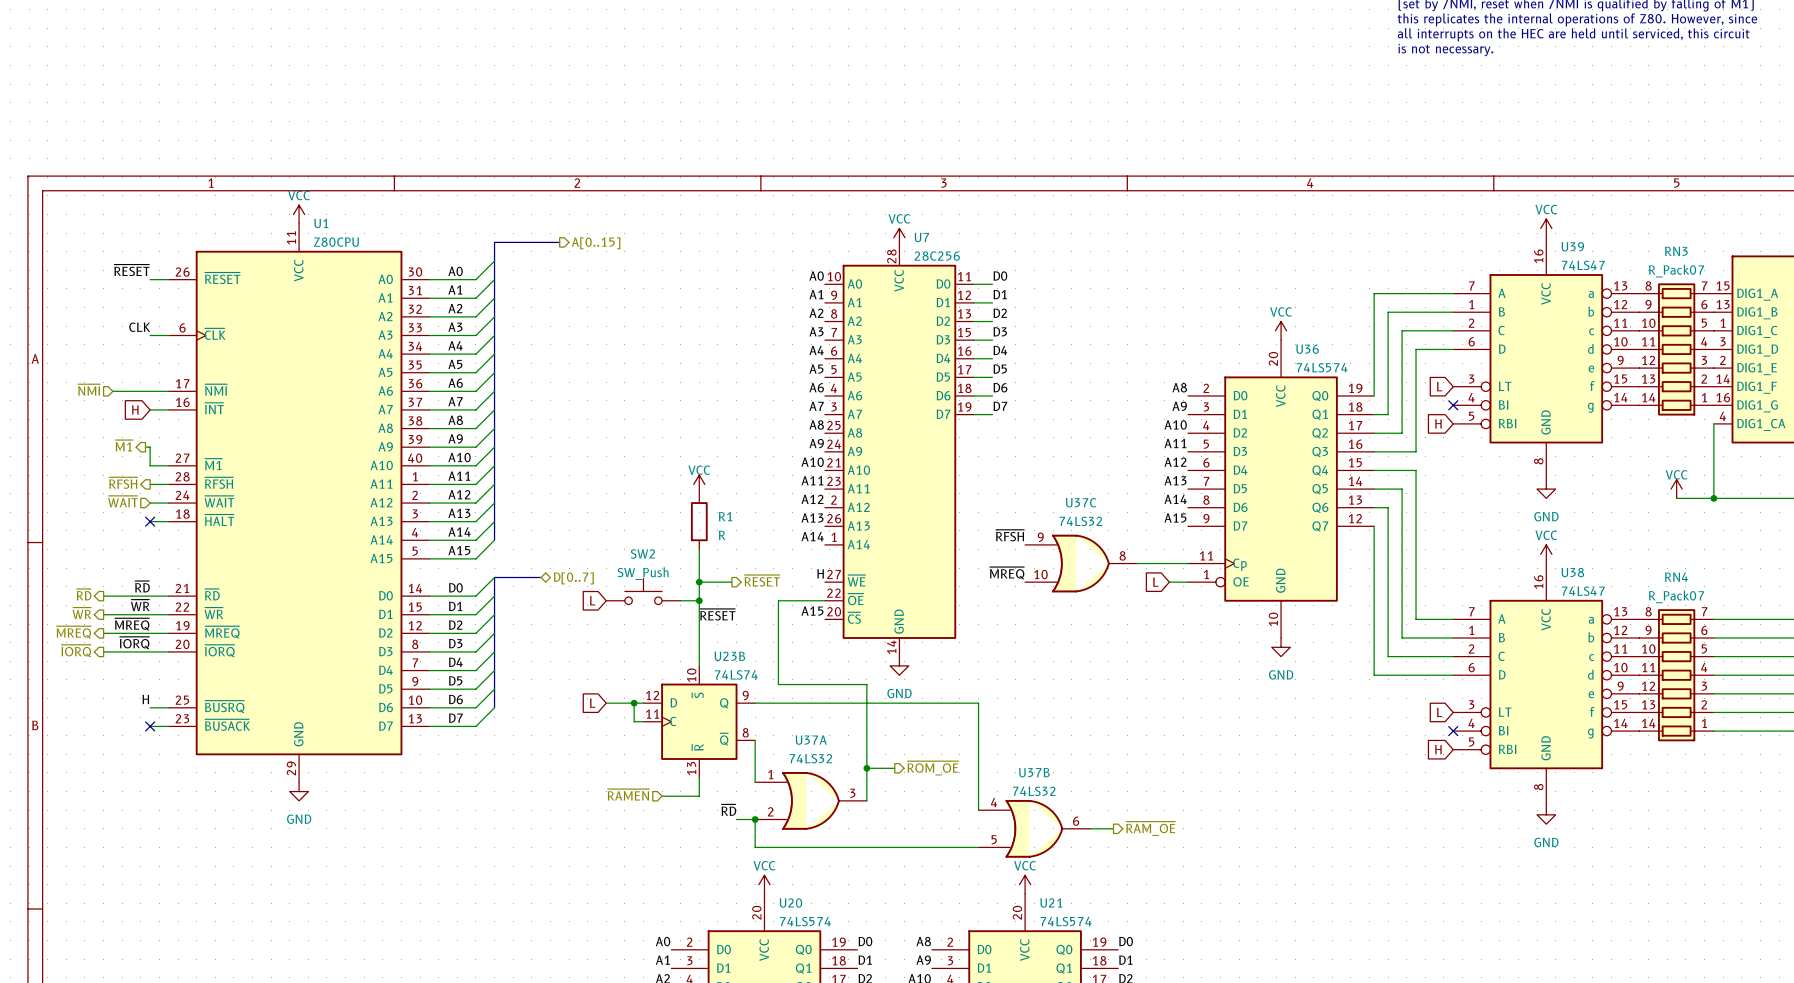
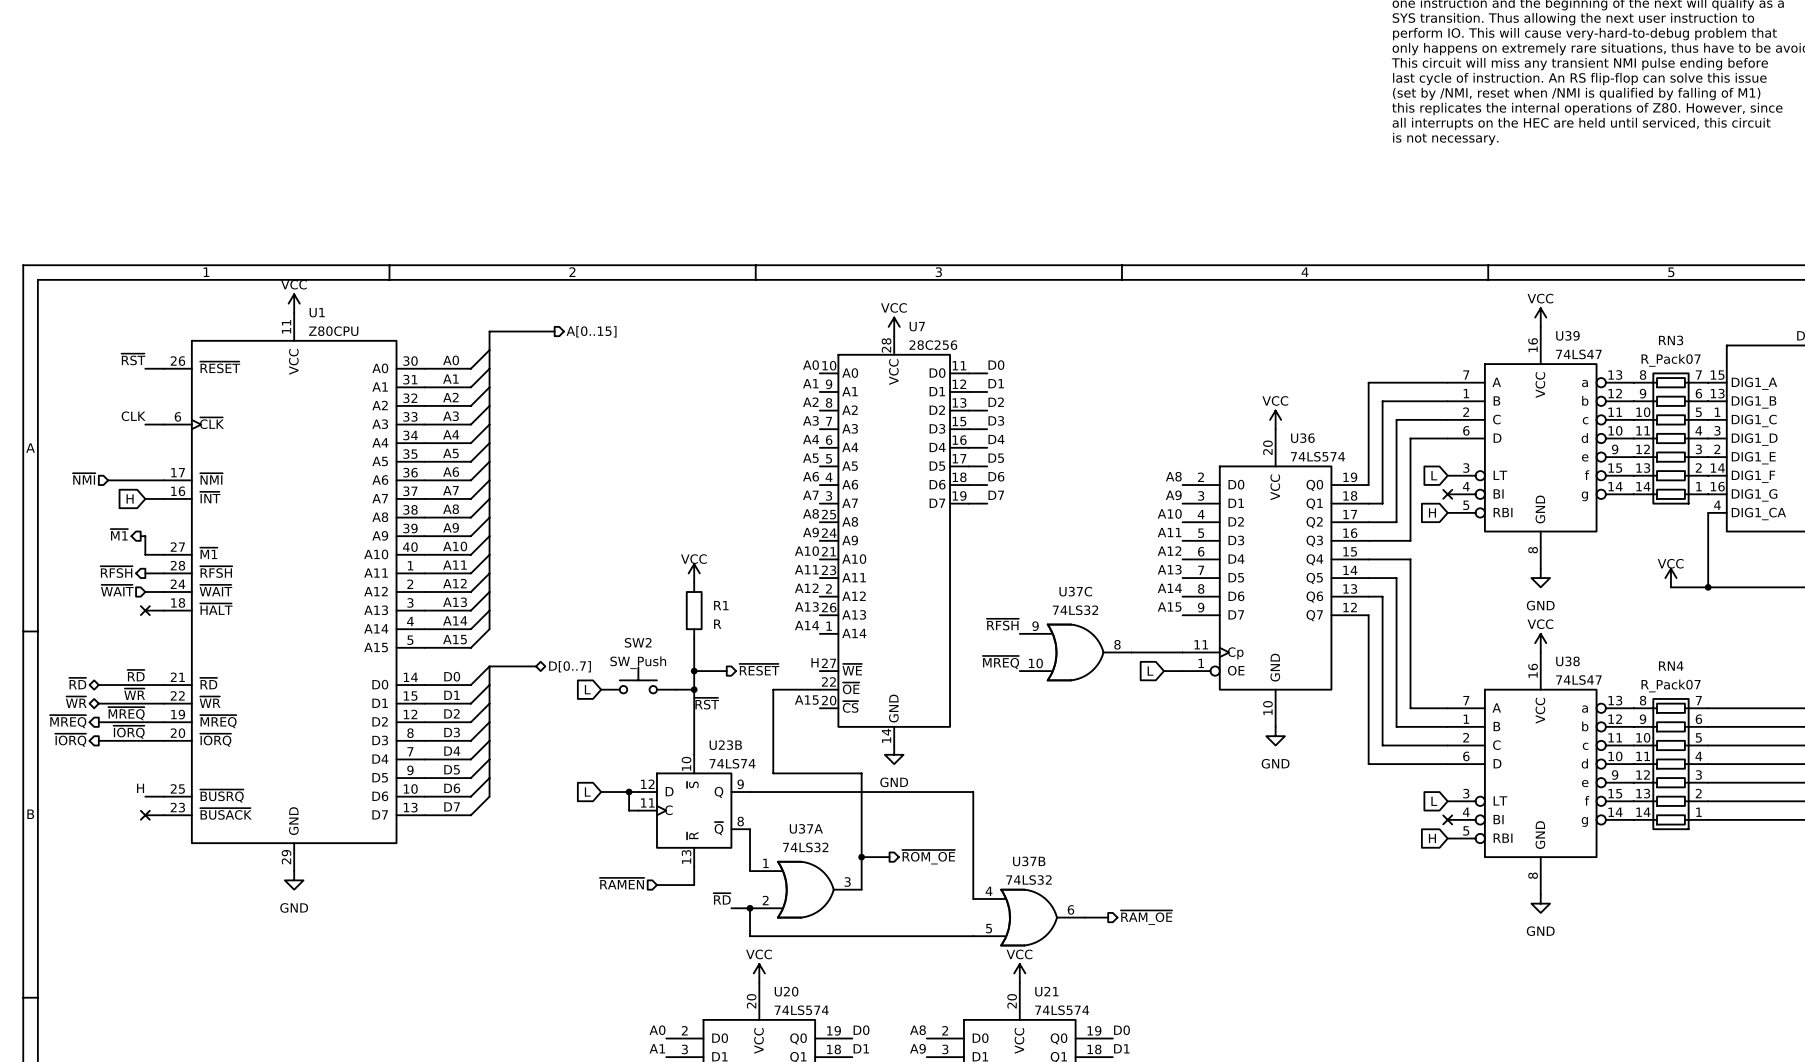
label: ~{RESET} (131, 270) -> ~{RST} (133, 359)
hierarchical label shape: output (84, 594) -> bidirectional (77, 683)
hierarchical label shape: output (81, 613) -> bidirectional (76, 702)
label: ~{RESET} (717, 614) -> ~{RST} (707, 703)

